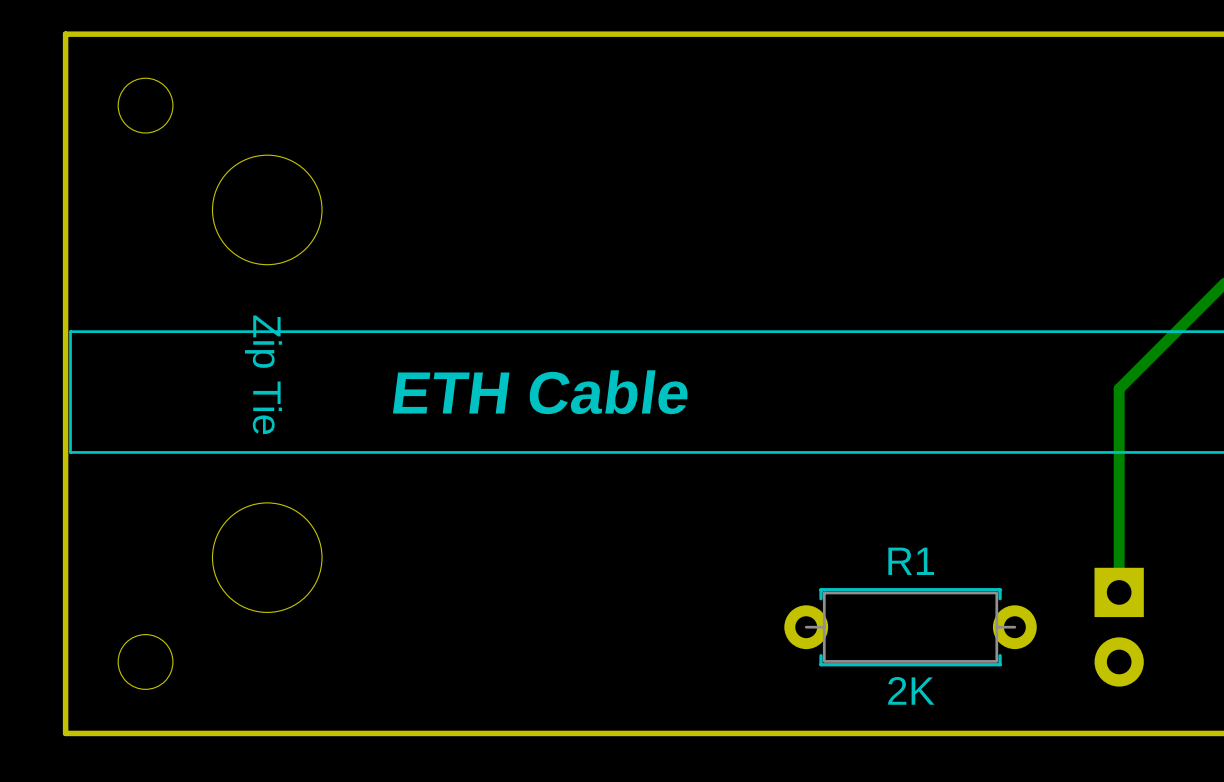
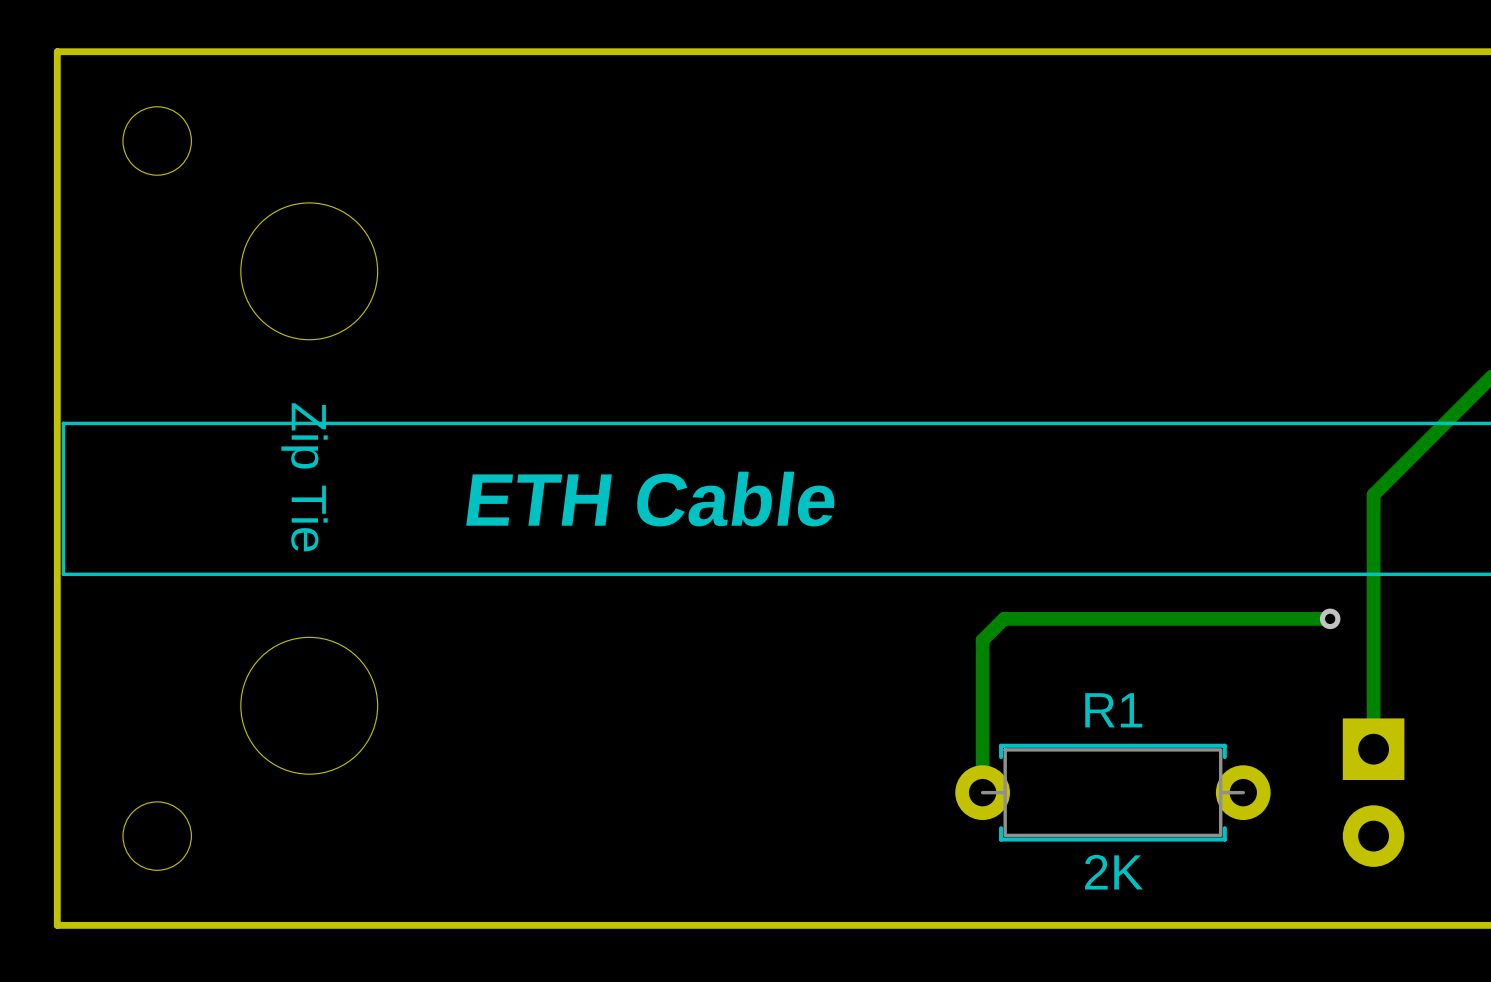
track: none -> (1330, 618) (1004, 618) (982, 640) (982, 792)
via: none -> (1330, 618)

